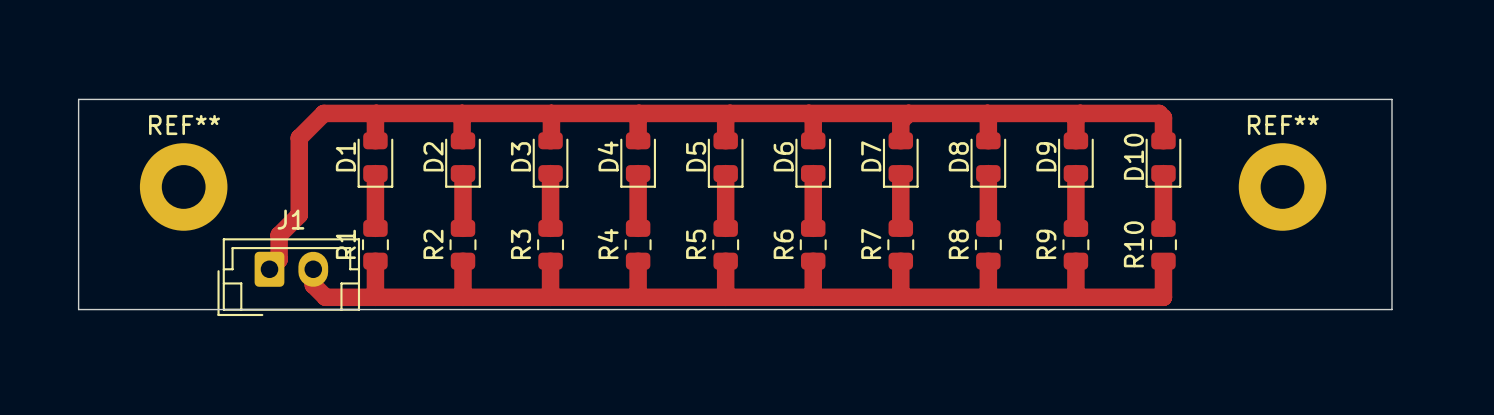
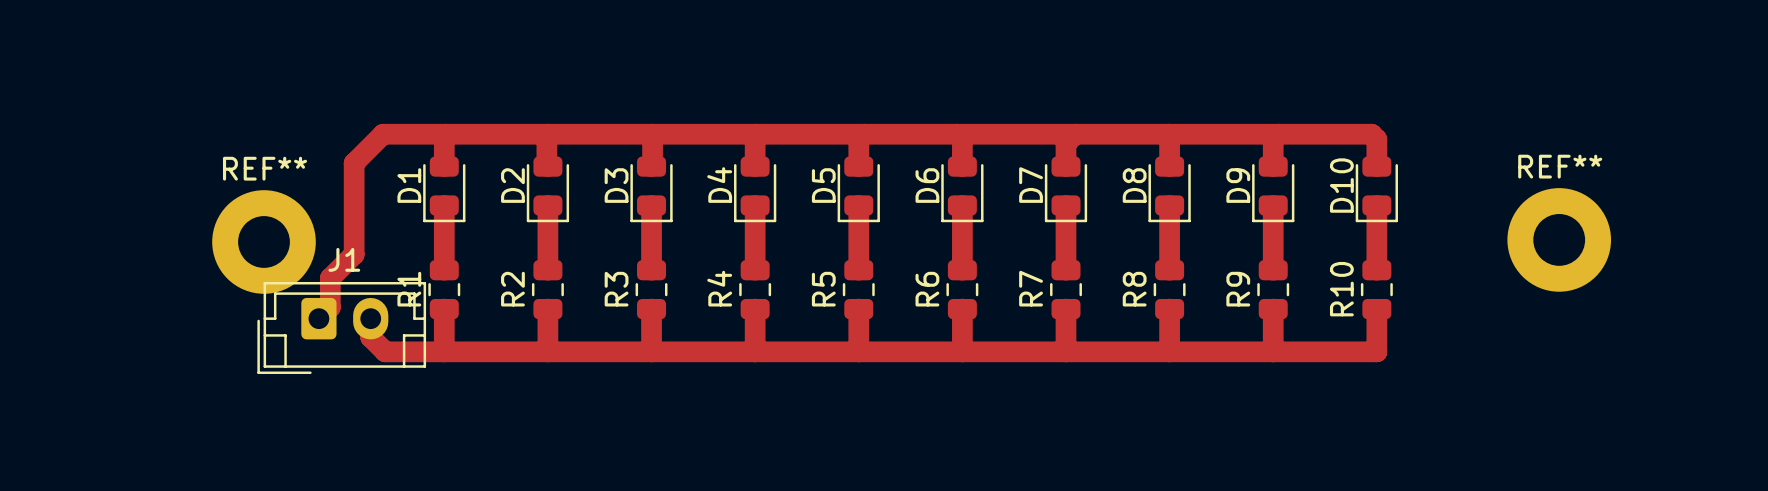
board edge: (78, 99) (78, 309) (1391, 309) (1391, 99) (78, 99) -> none
REF** position: (183, 186) -> (264, 241)
REF** position: (1282, 186) -> (1559, 239)

